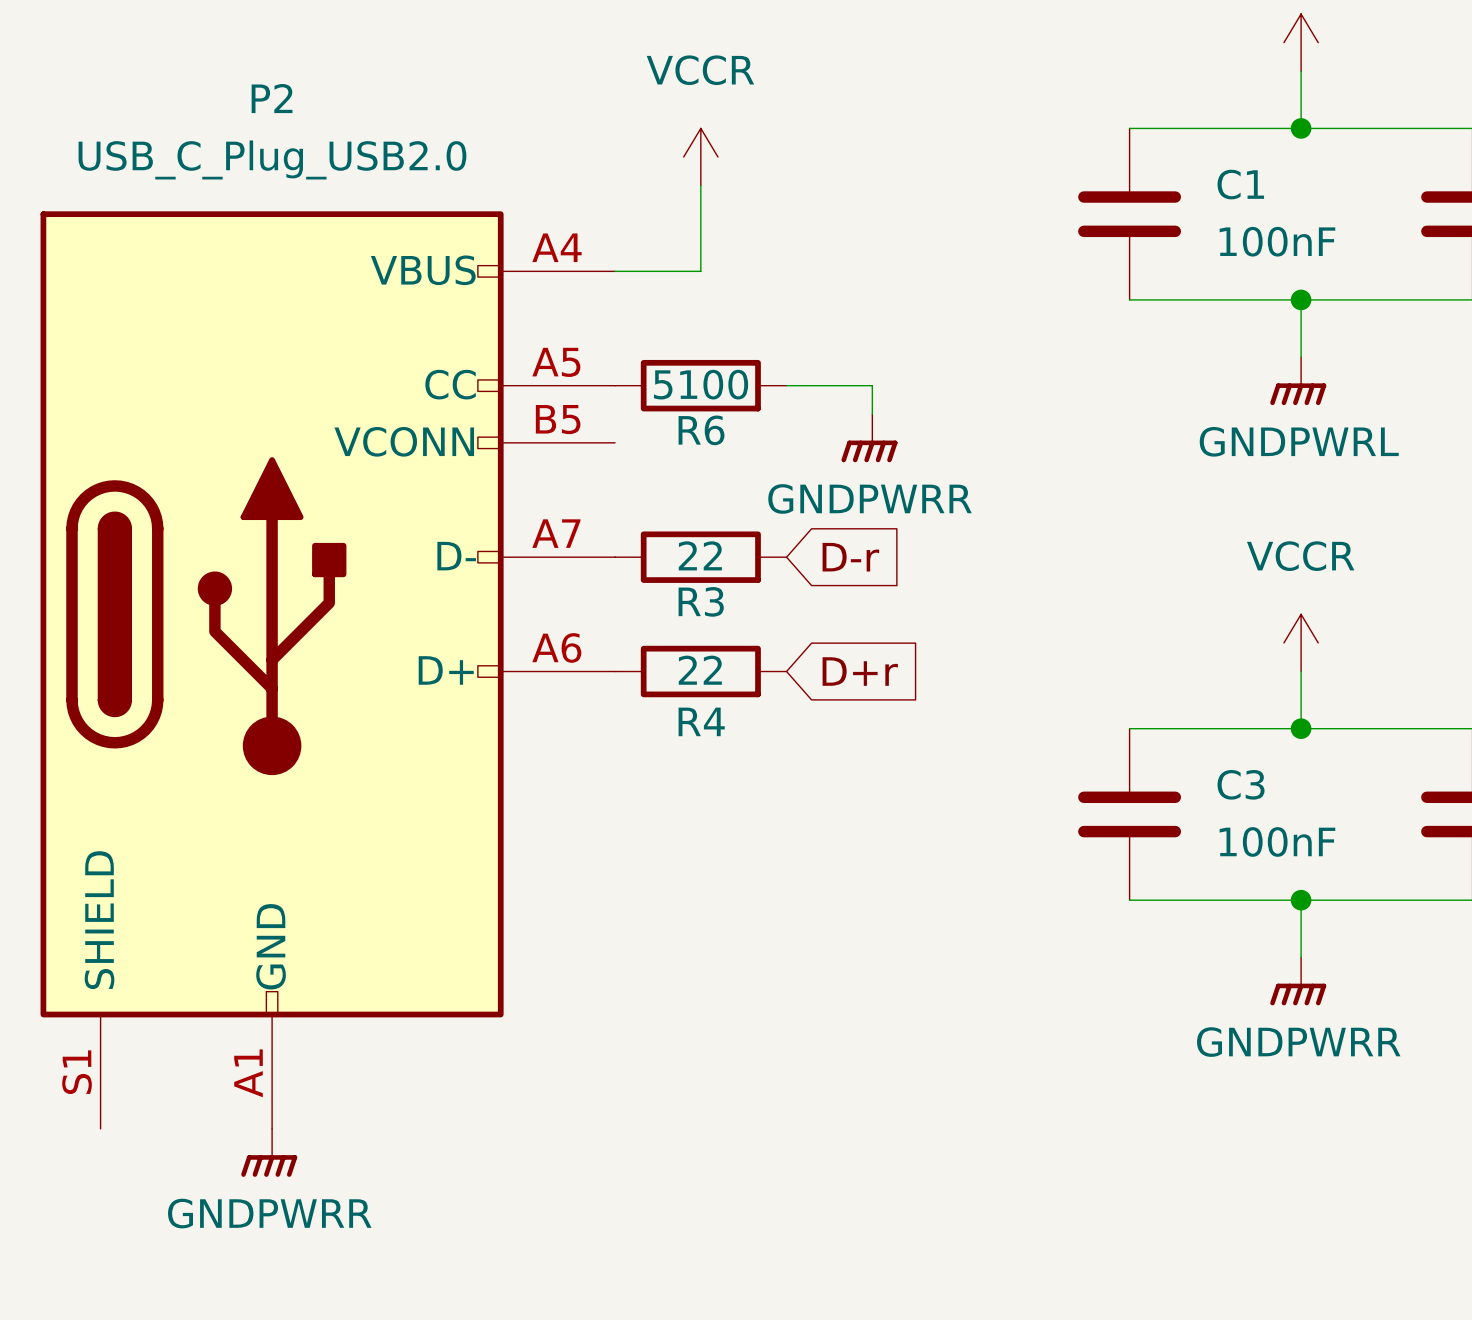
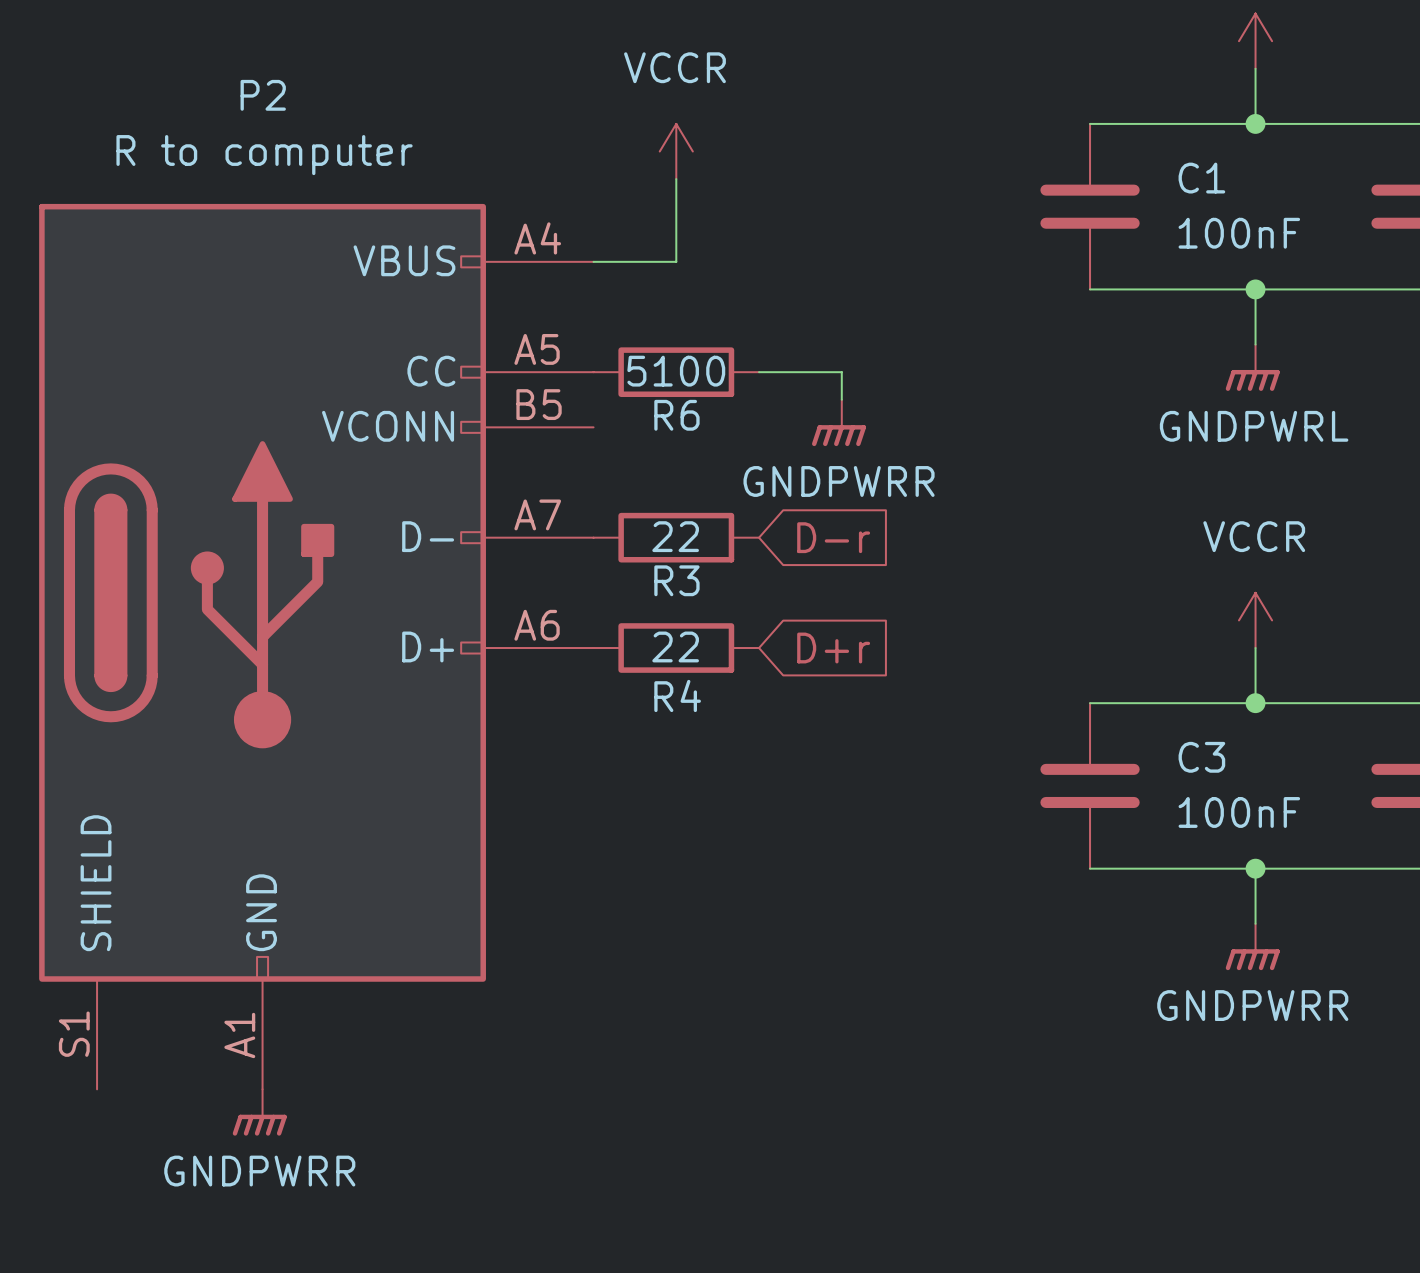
P2 value: USB_C_Plug_USB2.0 (272, 159) -> R to computer (264, 155)

